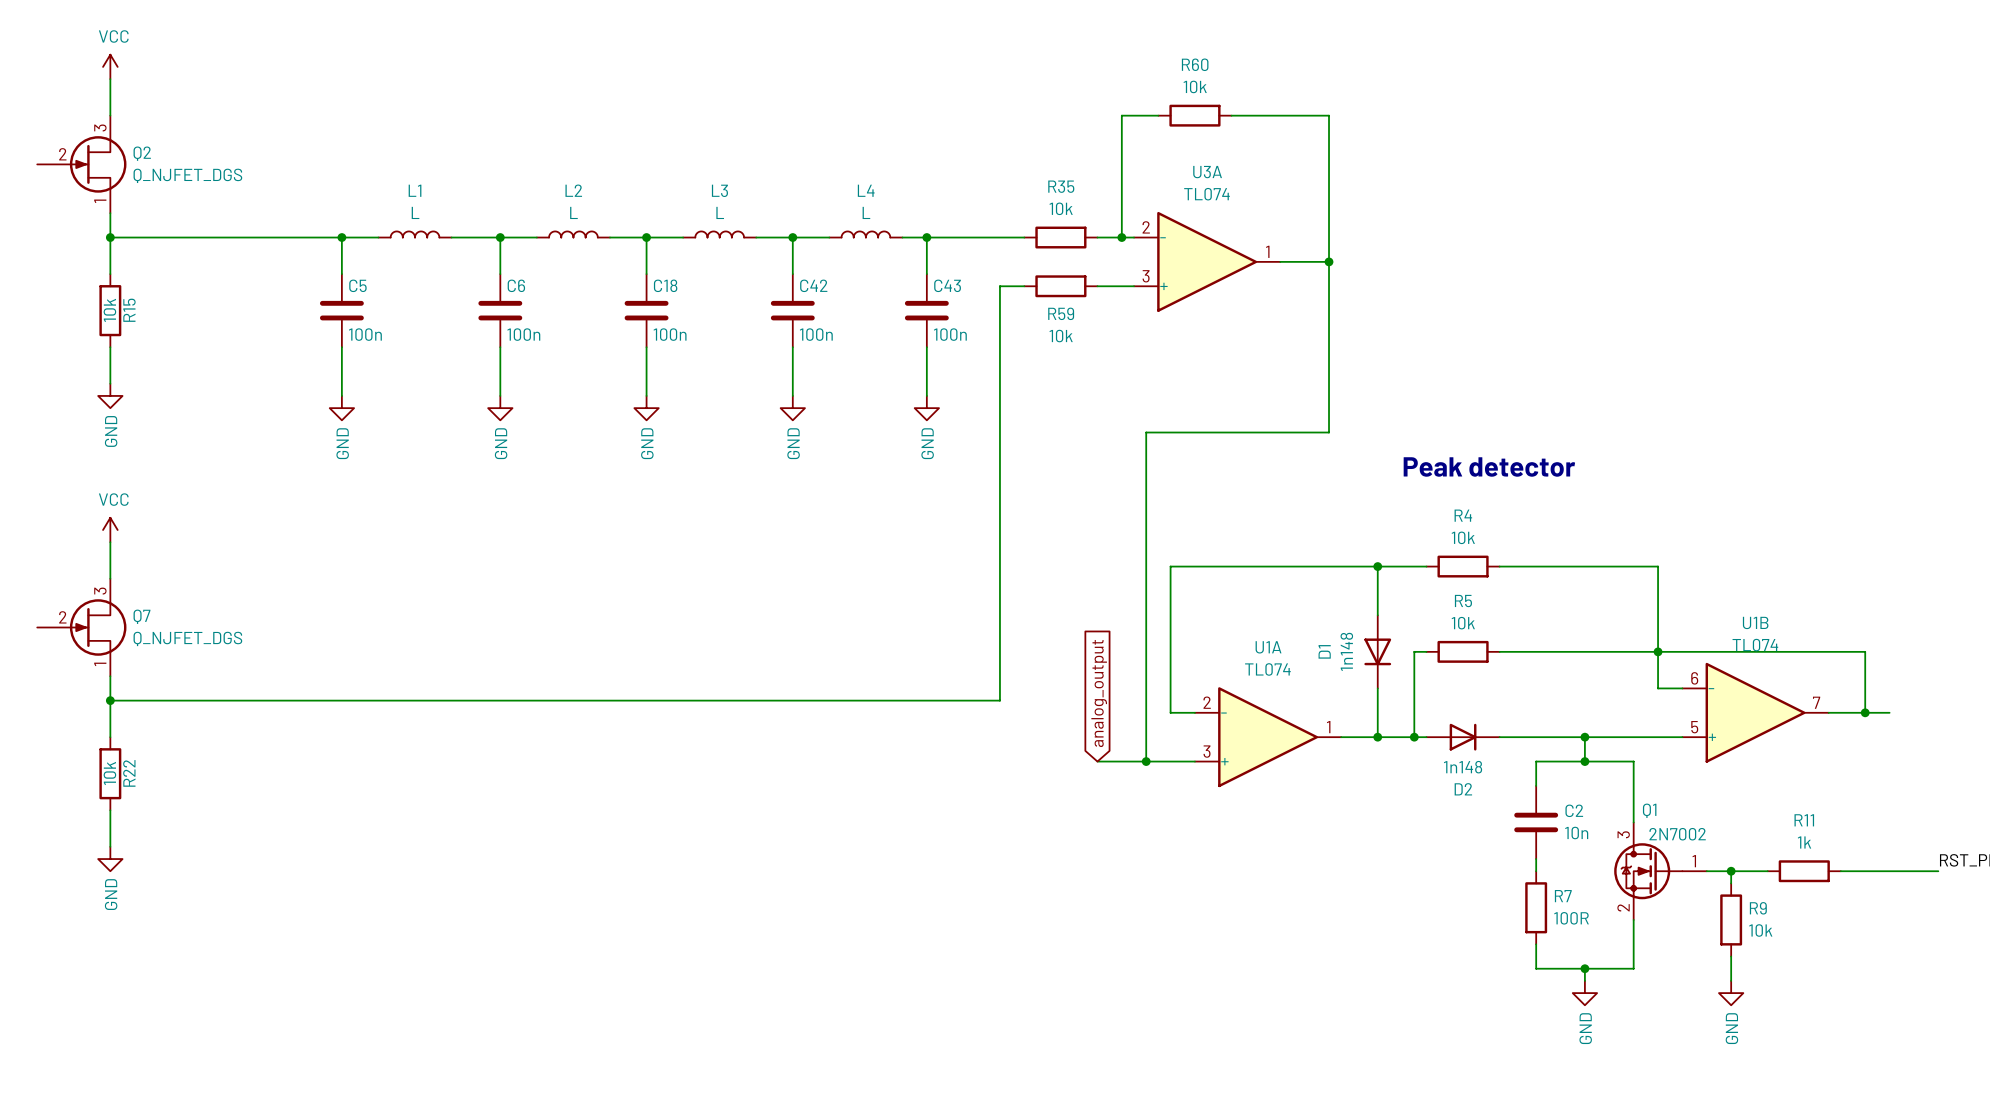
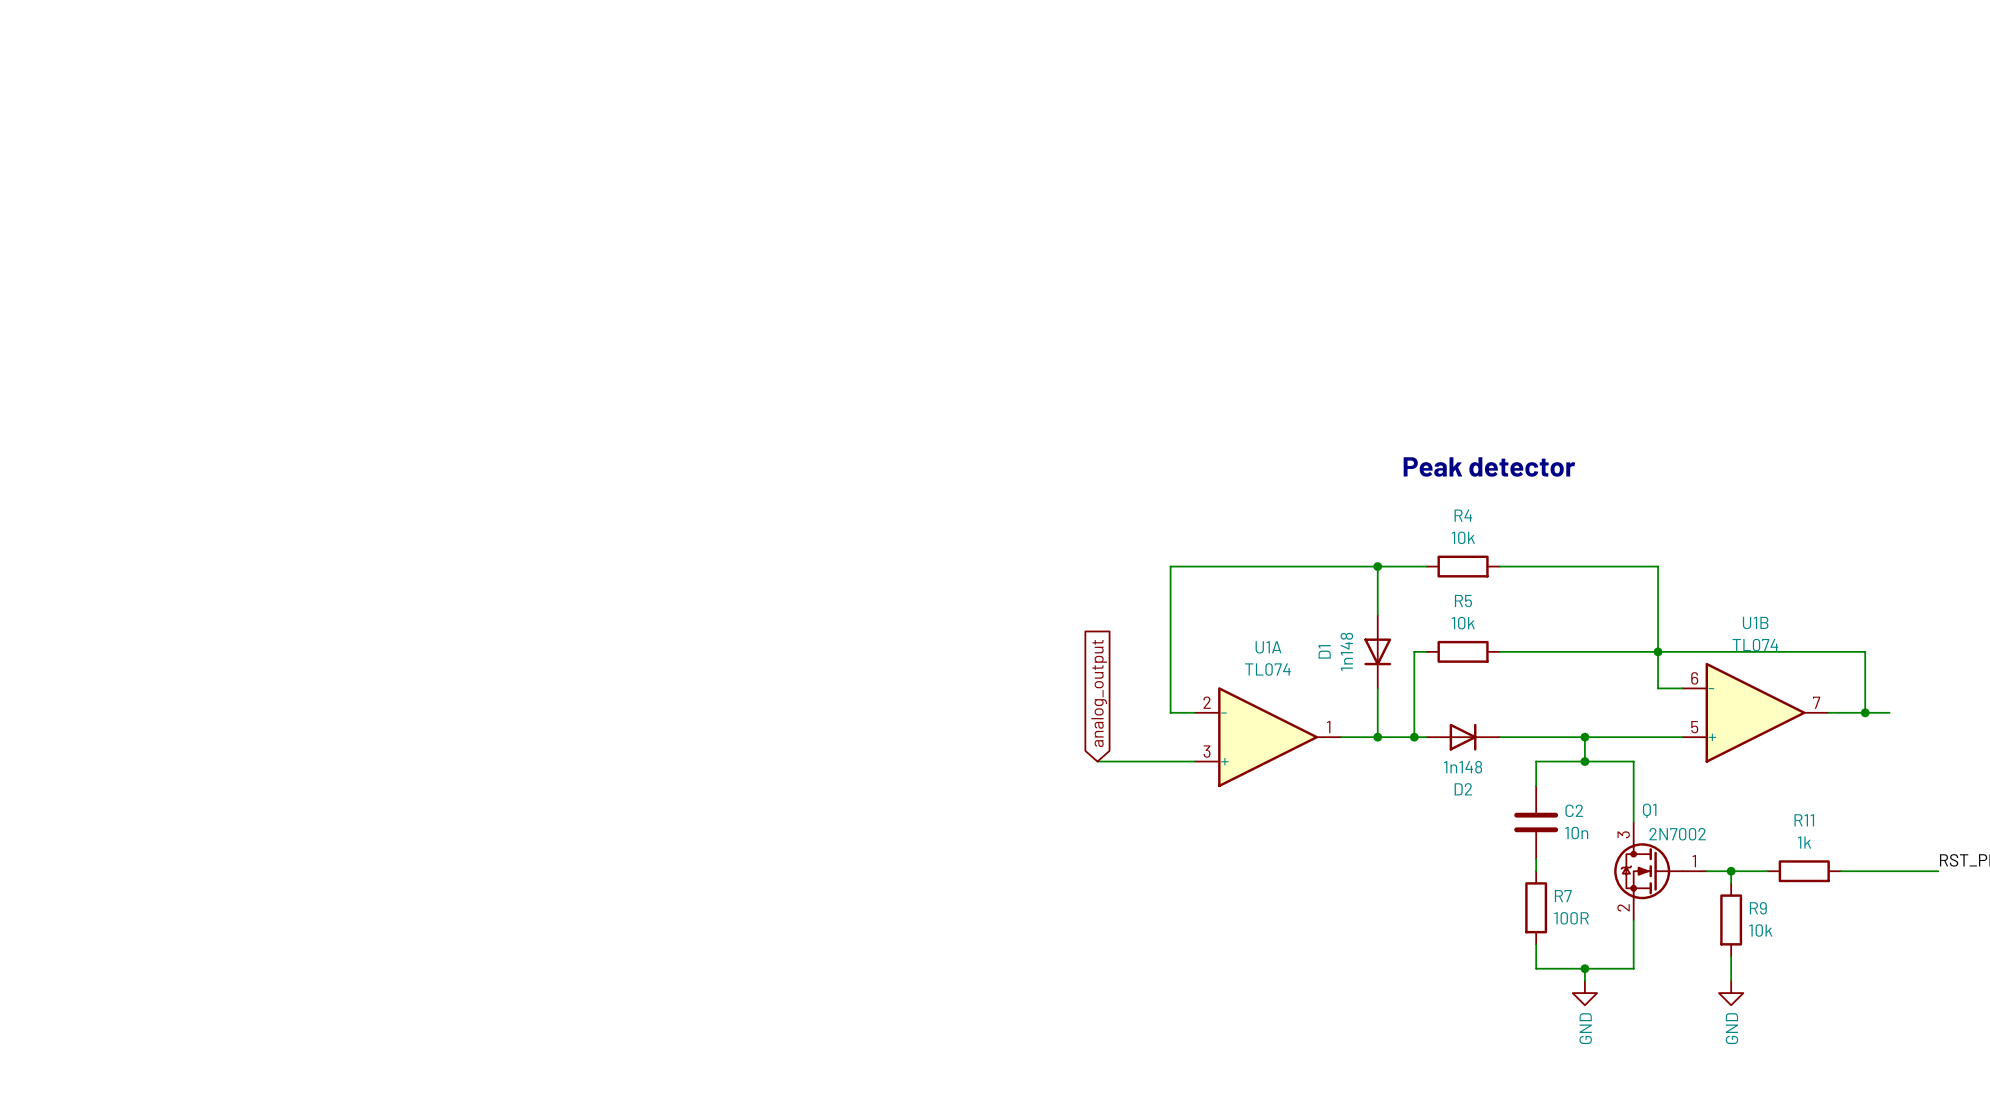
power symbol: VCC (110, 66) -> none
wire: (110, 79) (110, 115) -> none
wire: (1158, 115) (1121, 115) (1121, 237) -> none
R60: 10k (1194, 115) -> none
wire: (1231, 115) (1329, 115) (1329, 432) (1146, 432) (1146, 761) -> none
Q2: Q_NJFET_DGS (81, 164) -> none
wire: (110, 213) (110, 274) -> none
L1: L (415, 234) -> none
L2: L (573, 234) -> none
L3: L (719, 234) -> none
L4: L (865, 234) -> none
wire: (110, 237) (378, 237) -> none
junction: (110, 237) -> none
wire: (341, 237) (341, 274) -> none
junction: (341, 237) -> none
wire: (451, 237) (536, 237) -> none
wire: (500, 237) (500, 274) -> none
junction: (500, 237) -> none
wire: (610, 237) (683, 237) -> none
wire: (646, 237) (646, 274) -> none
junction: (646, 237) -> none
wire: (756, 237) (829, 237) -> none
wire: (792, 237) (792, 274) -> none
junction: (792, 237) -> none
wire: (902, 237) (1024, 237) -> none
wire: (926, 237) (926, 274) -> none
junction: (926, 237) -> none
R35: 10k (1060, 237) -> none
wire: (1097, 237) (1134, 237) -> none
junction: (1121, 237) -> none
U3A: TL074 (1207, 261) -> none
wire: (1280, 261) (1329, 261) -> none
junction: (1329, 261) -> none
wire: (1024, 286) (999, 286) (999, 700) (110, 700) -> none
R59: 10k (1060, 286) -> none
wire: (1097, 286) (1134, 286) -> none
R15: 10k (110, 310) -> none
C5: 100n (341, 310) -> none
C6: 100n (500, 310) -> none
C18: 100n (646, 310) -> none
C42: 100n (792, 310) -> none
C43: 100n (926, 310) -> none
wire: (110, 347) (110, 383) -> none
wire: (341, 347) (341, 395) -> none
wire: (500, 347) (500, 395) -> none
wire: (646, 347) (646, 395) -> none
wire: (792, 347) (792, 395) -> none
wire: (926, 347) (926, 395) -> none
power symbol: GND (110, 395) -> none
power symbol: GND (341, 408) -> none
power symbol: GND (500, 408) -> none
power symbol: GND (646, 408) -> none
power symbol: GND (792, 408) -> none
power symbol: GND (926, 408) -> none
power symbol: VCC (110, 530) -> none
wire: (110, 542) (110, 578) -> none
Q7: Q_NJFET_DGS (81, 627) -> none
wire: (110, 676) (110, 737) -> none
junction: (110, 700) -> none
junction: (1146, 761) -> none
R22: 10k (110, 773) -> none
wire: (110, 810) (110, 846) -> none
power symbol: GND (110, 859) -> none

